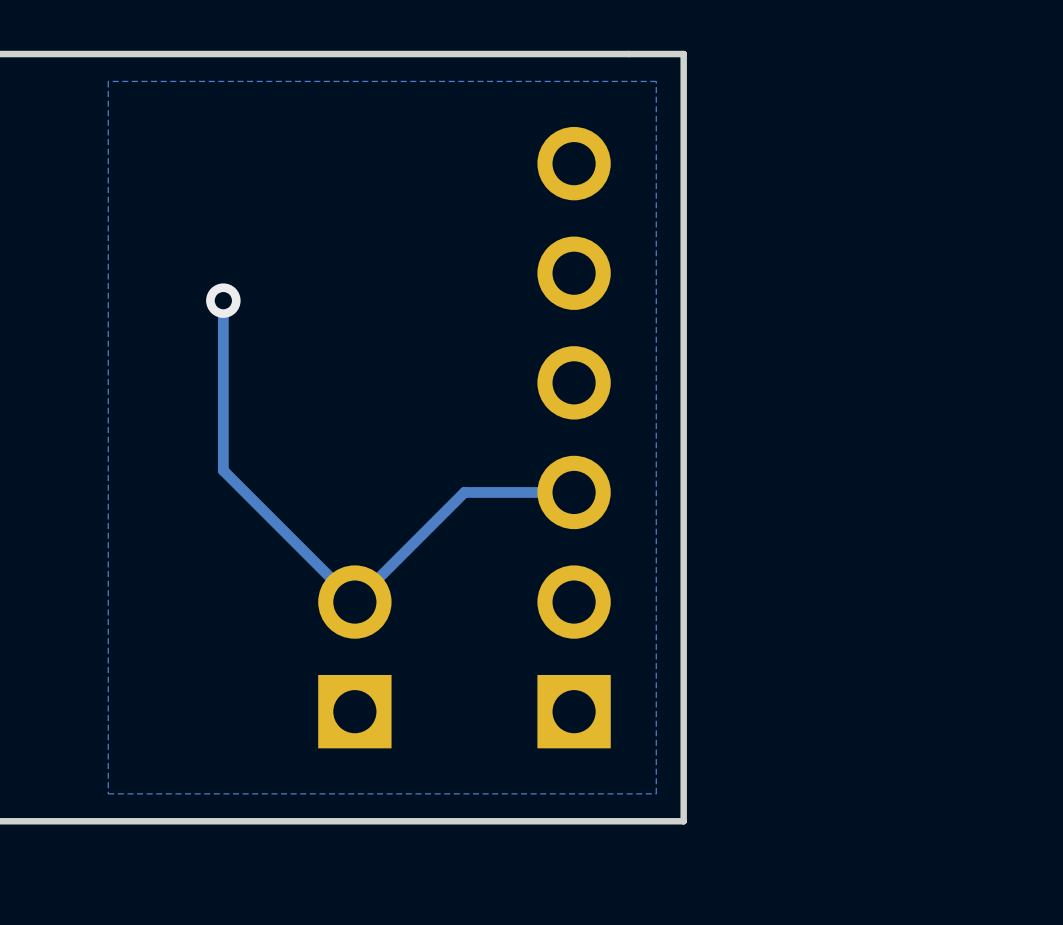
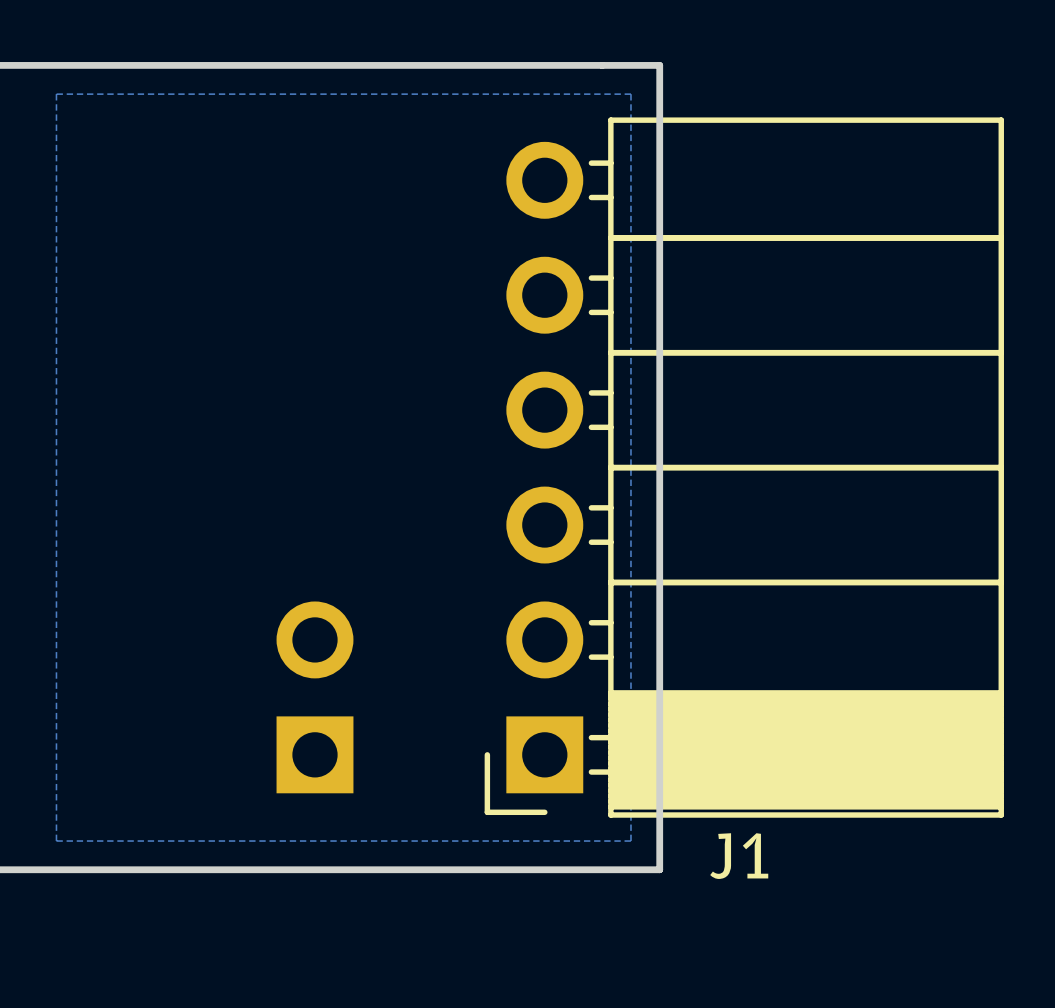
track: (223, 300) (223, 470) (354, 602) (464, 492) (574, 492) -> none
via: (223, 300) -> none
part: (574, 437) -> none
J1: none -> (744, 467)

